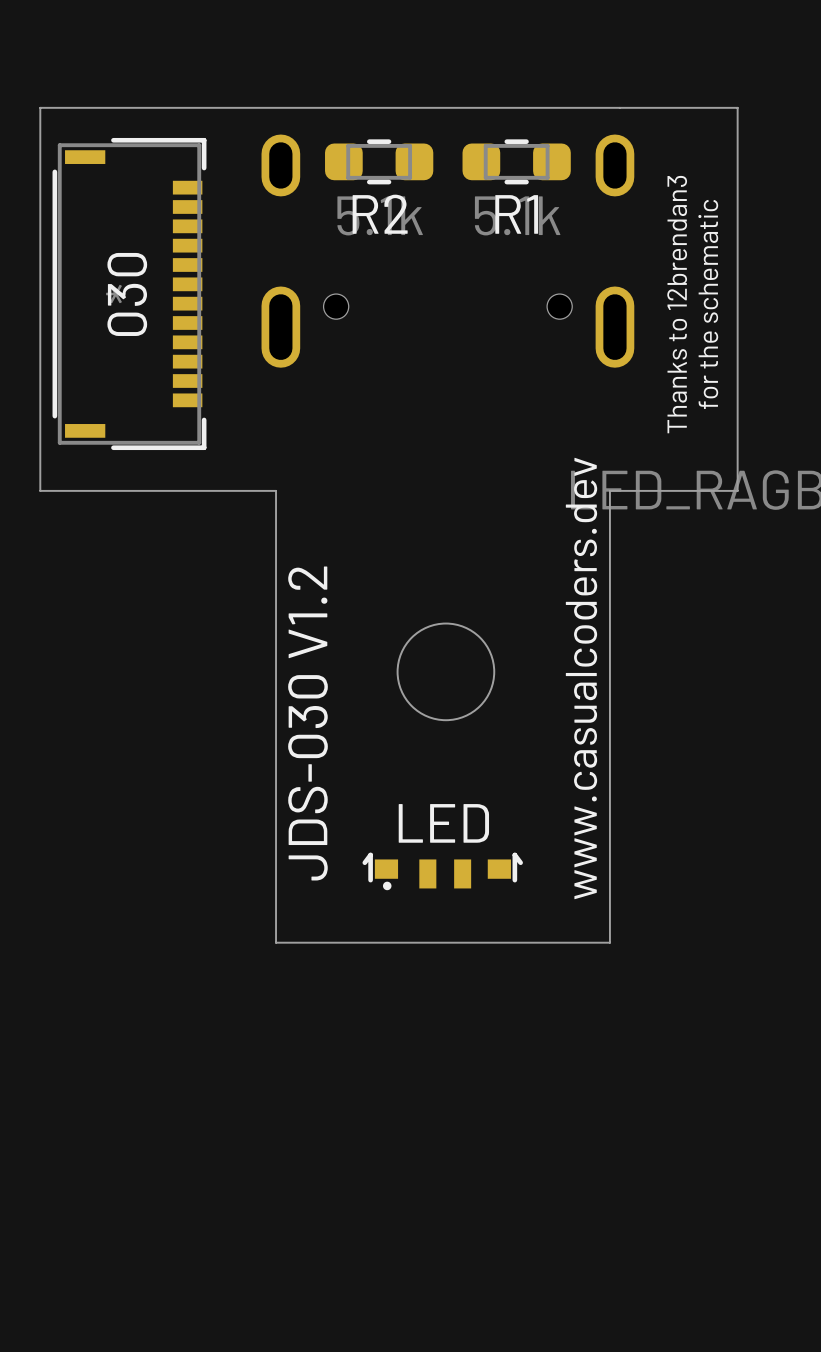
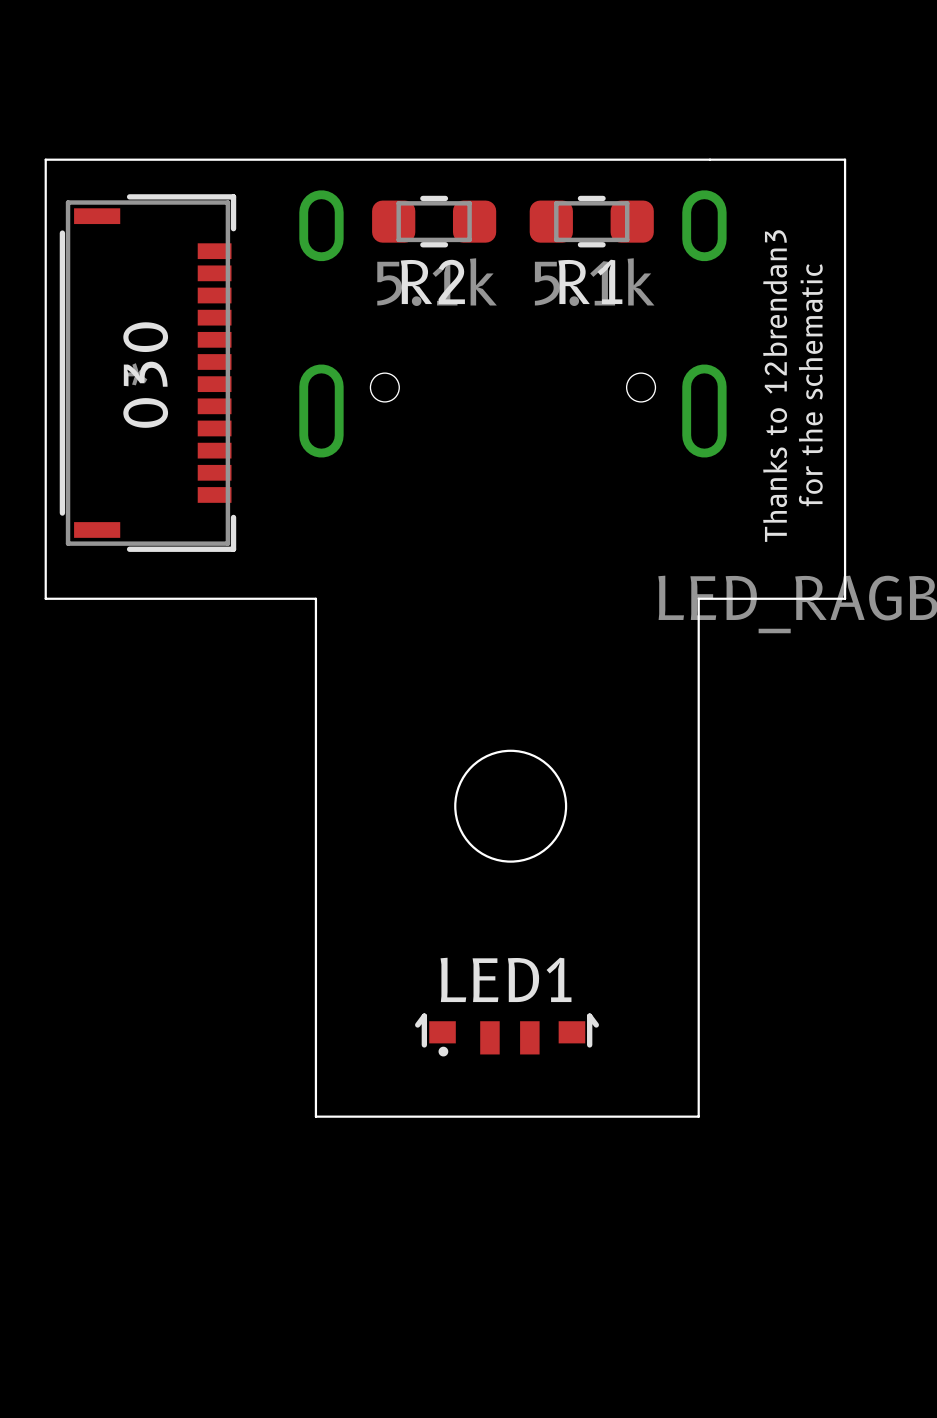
text: www.casualcoders.dev (581, 678) -> none
text: JDS-030 V1.2 (307, 723) -> none
LED name: LED (443, 823) -> LED1 (506, 979)

